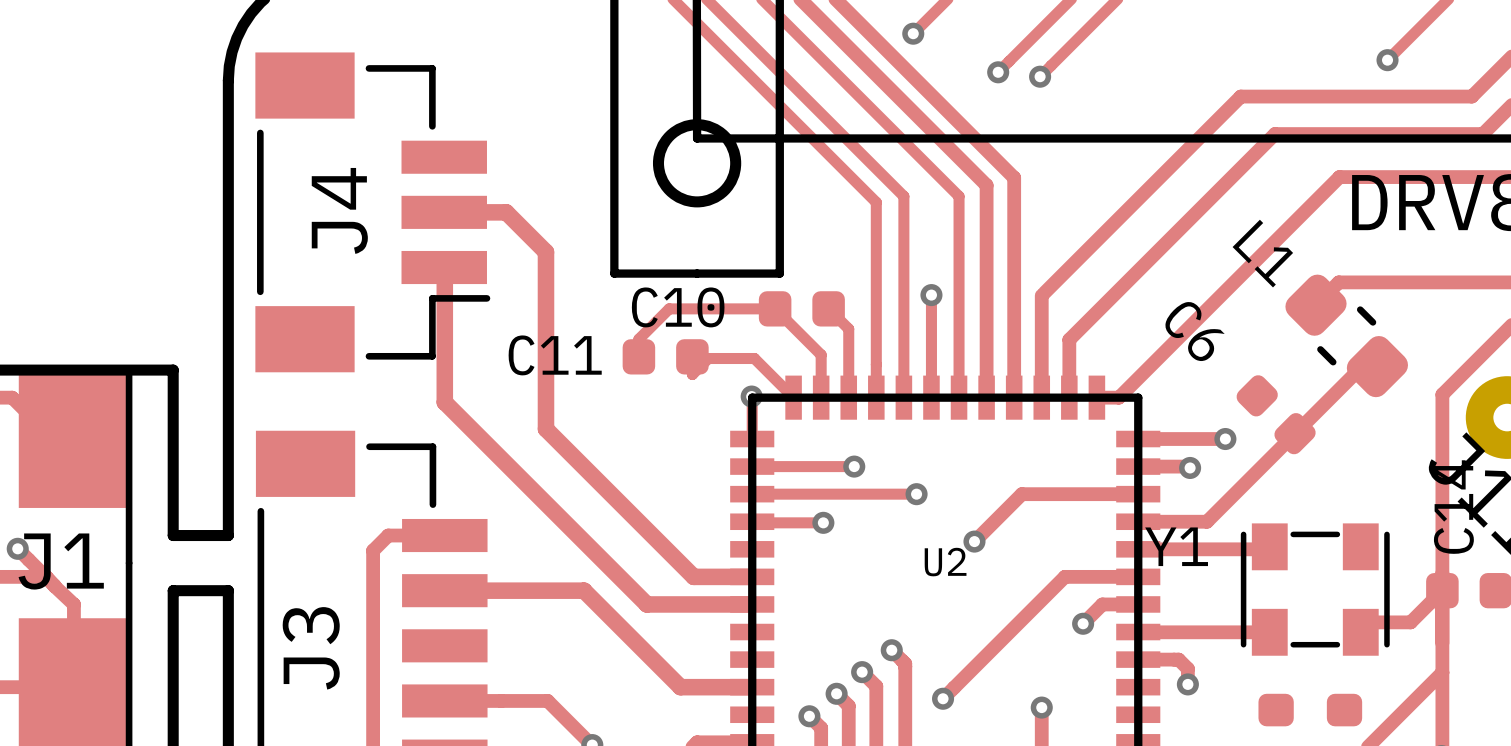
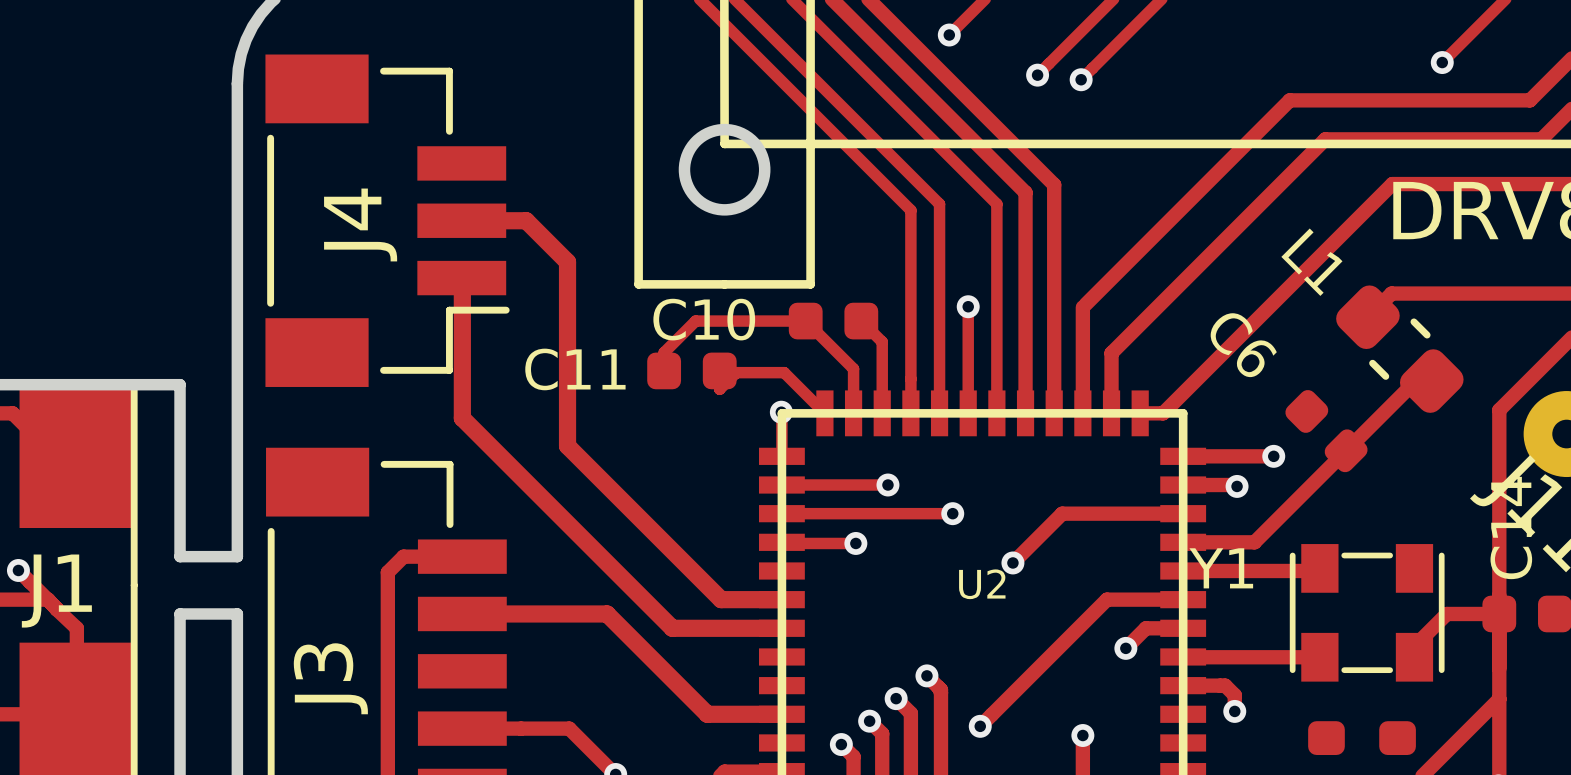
track: (1442, 590) (1410, 622) (1365, 622) (1362, 619) -> (1499, 613) (1446, 613) (1416, 644)

